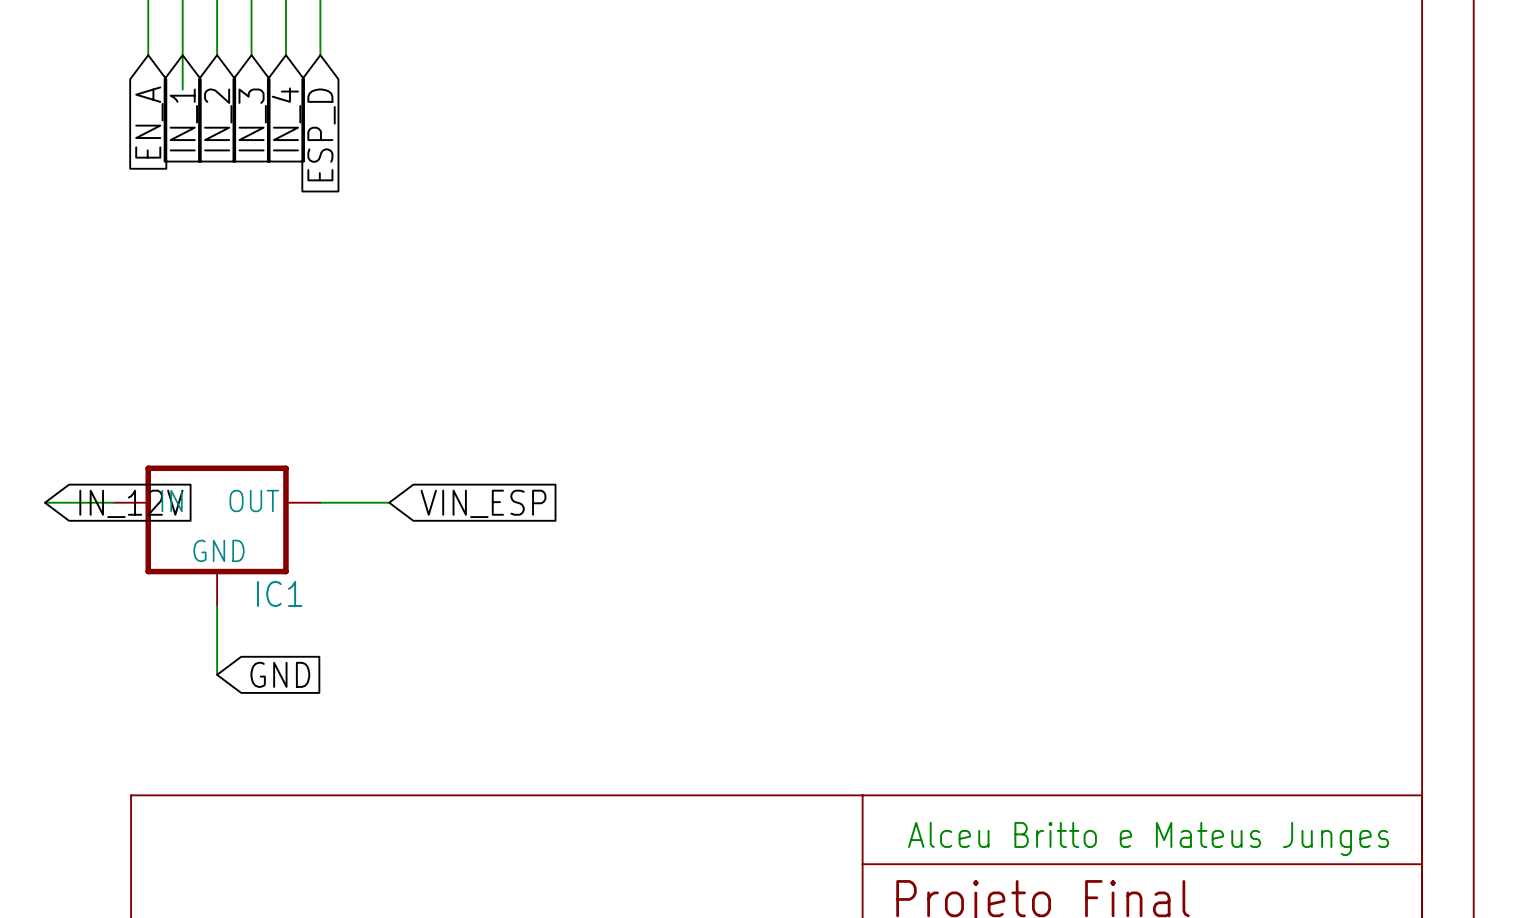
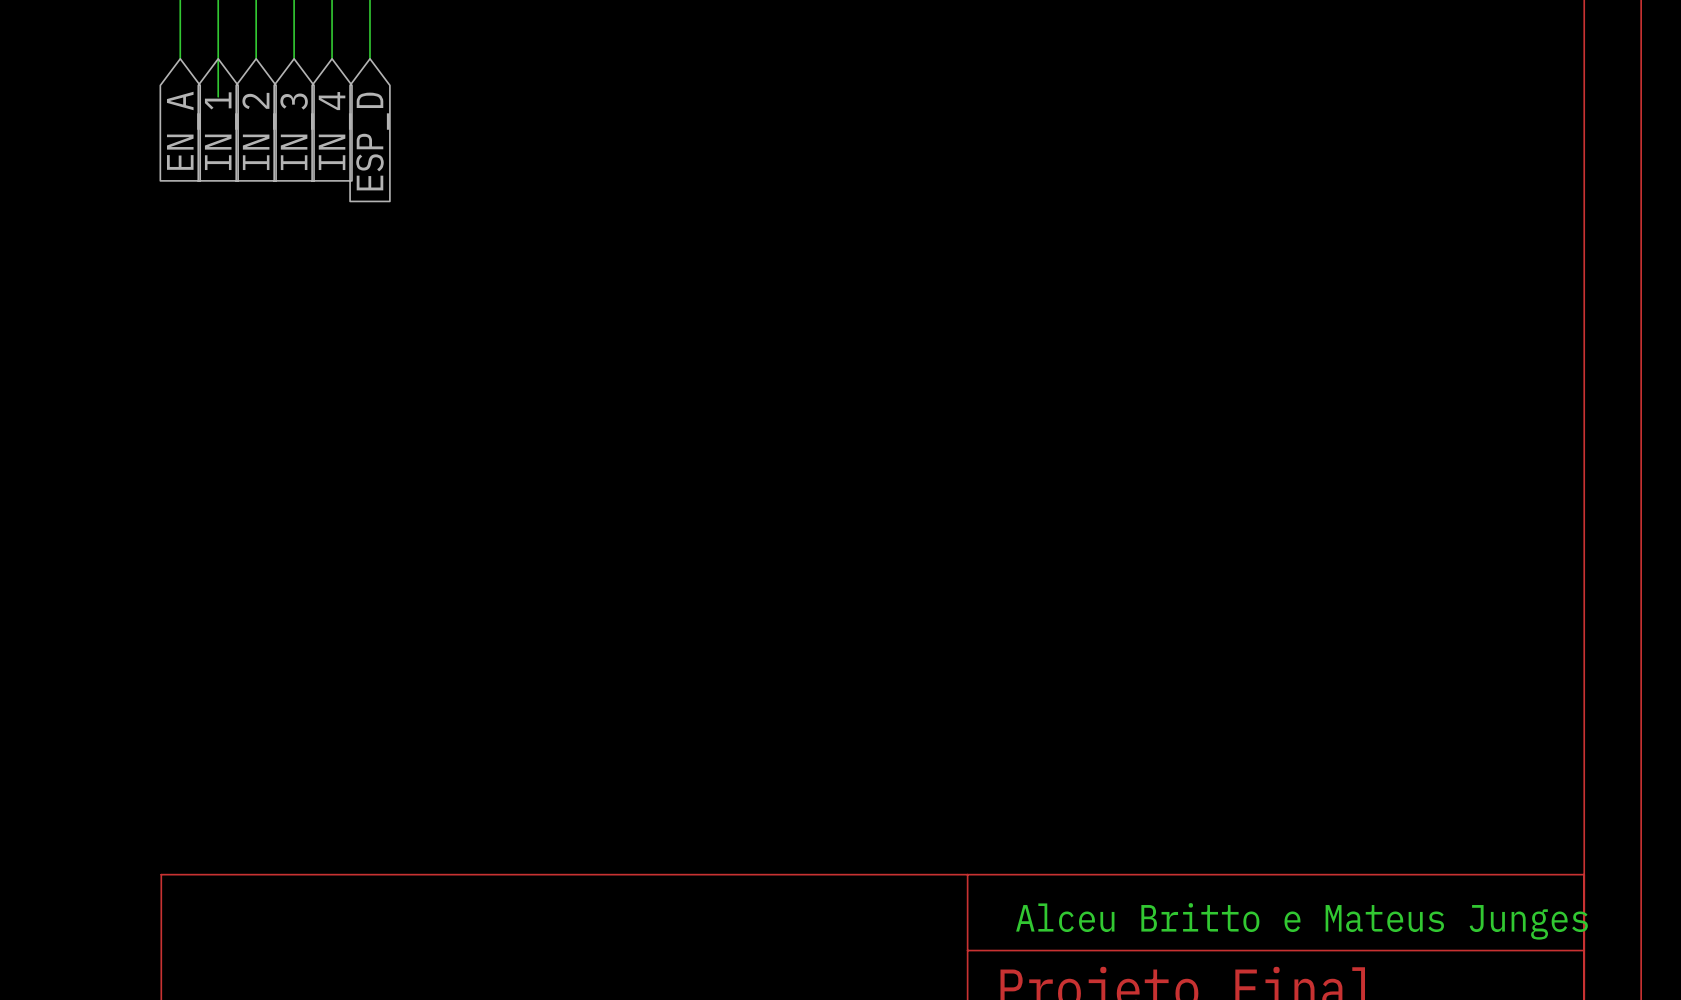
wire: (44, 502) (113, 502) -> none
wire: (320, 502) (389, 502) -> none
global label: IN_12V (131, 503) -> none
global label: VIN_ESP (483, 503) -> none
IC1: (217, 535) -> none
wire: (217, 606) (217, 674) -> none
global label: GND (280, 674) -> none

